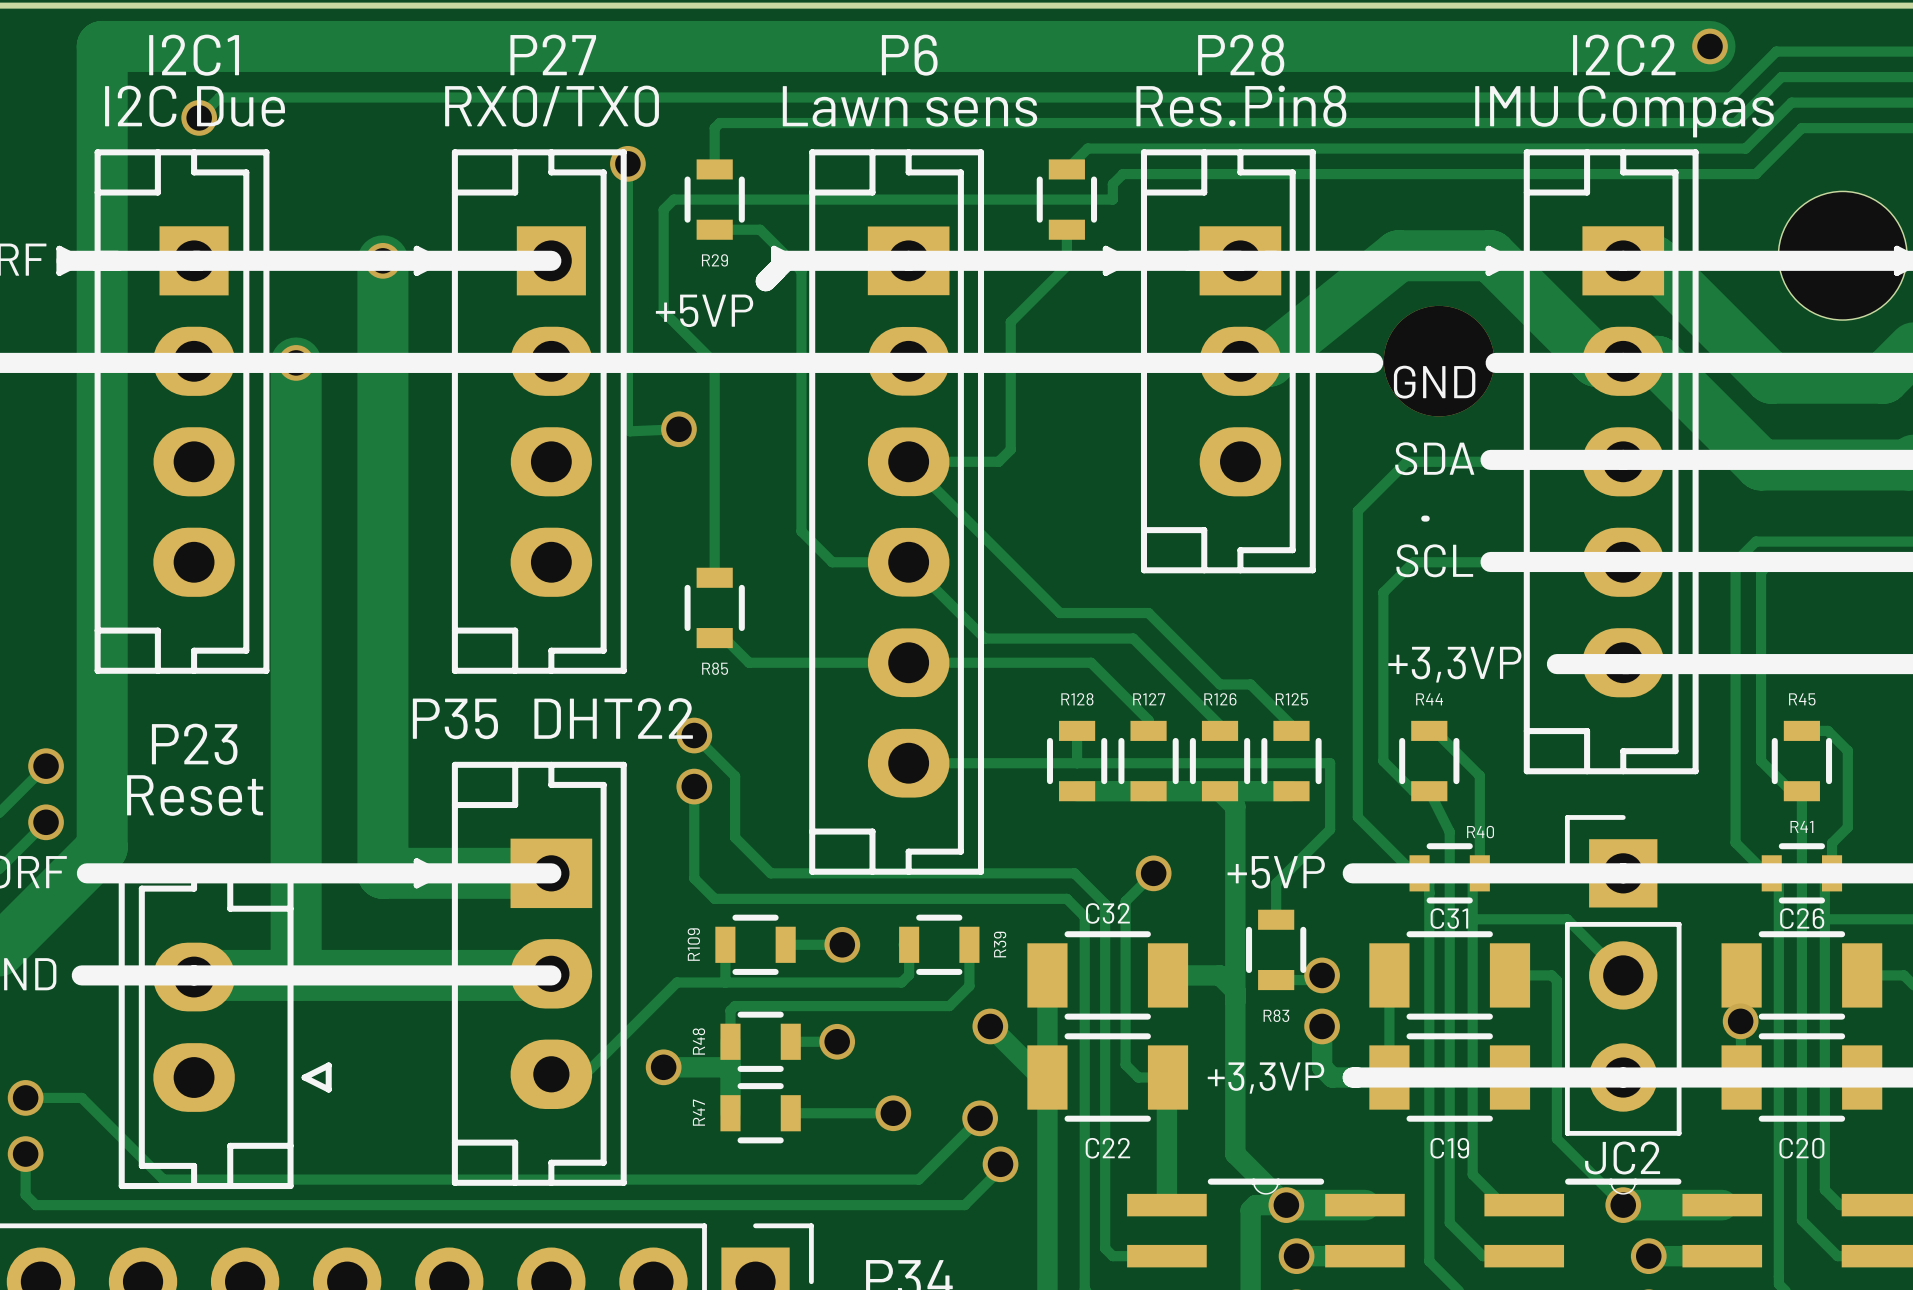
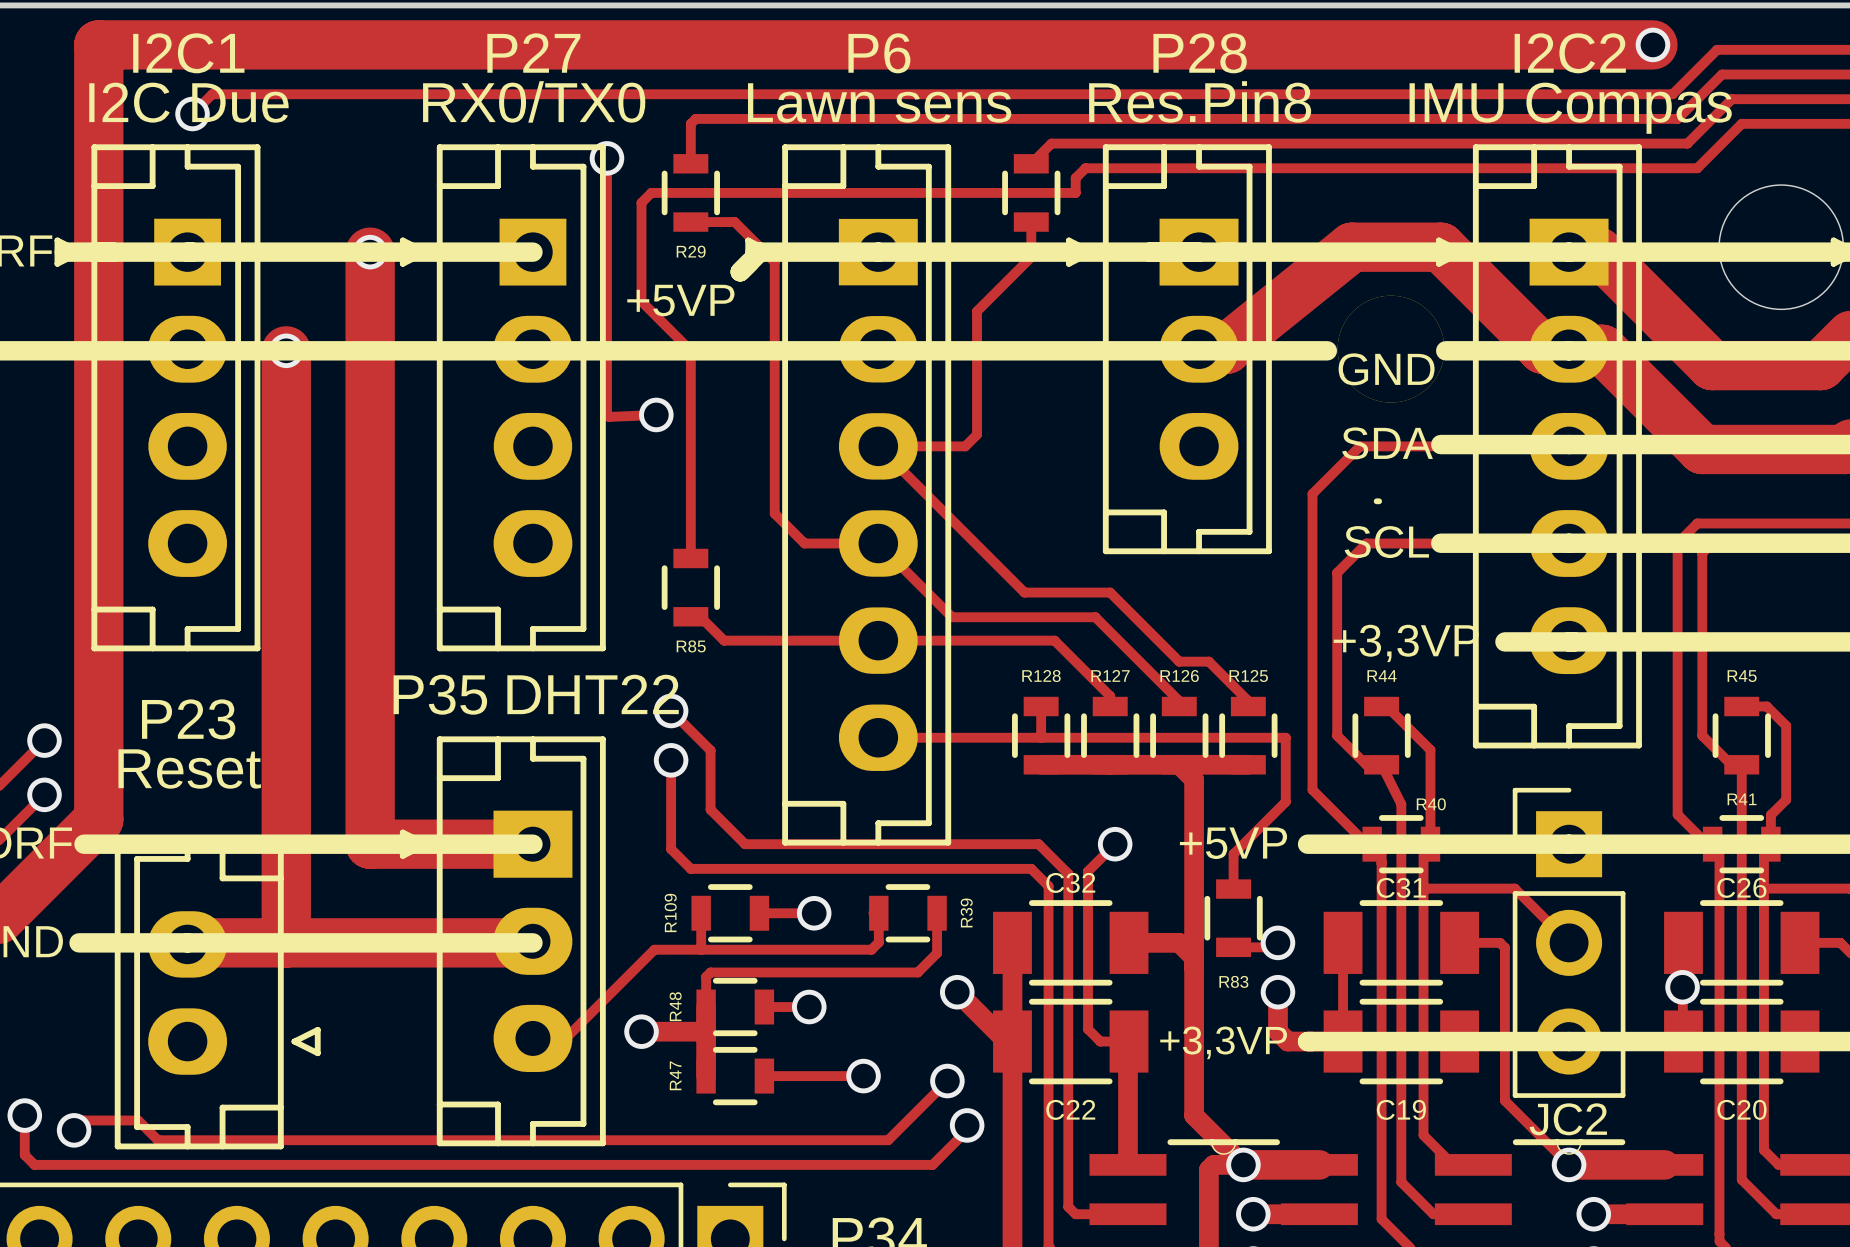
track: (25, 1097) (81, 1097) (143, 1159) -> (74, 1130) (83, 1120) (138, 1120)
via position: (25, 1097) -> (74, 1130)

